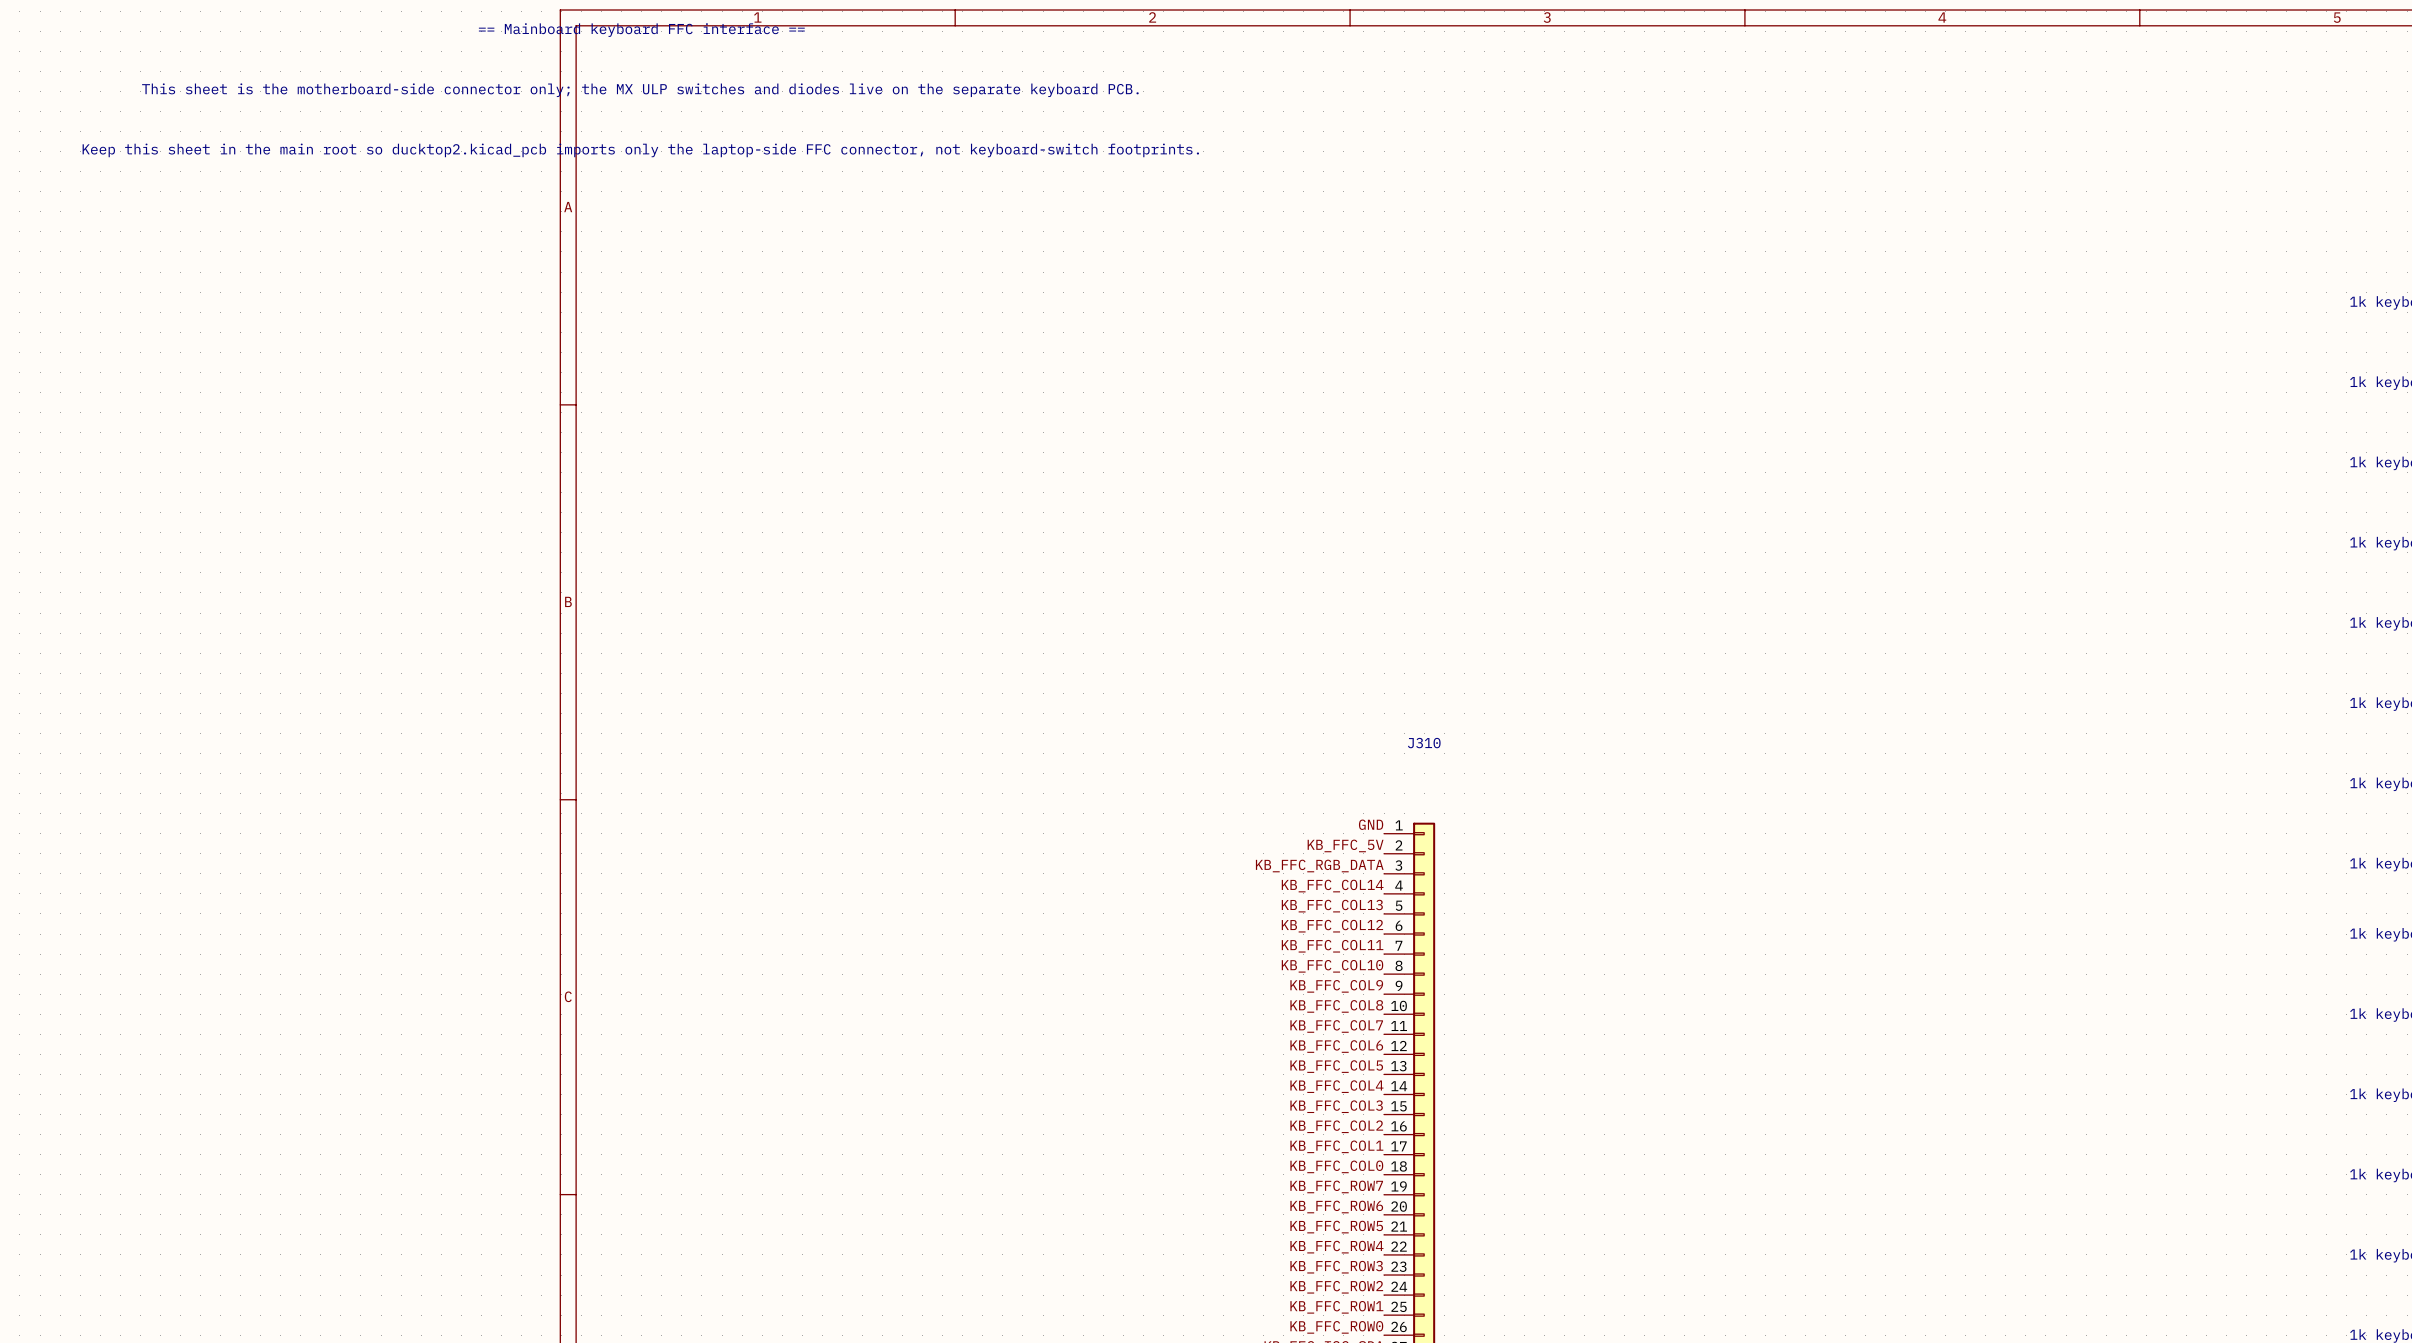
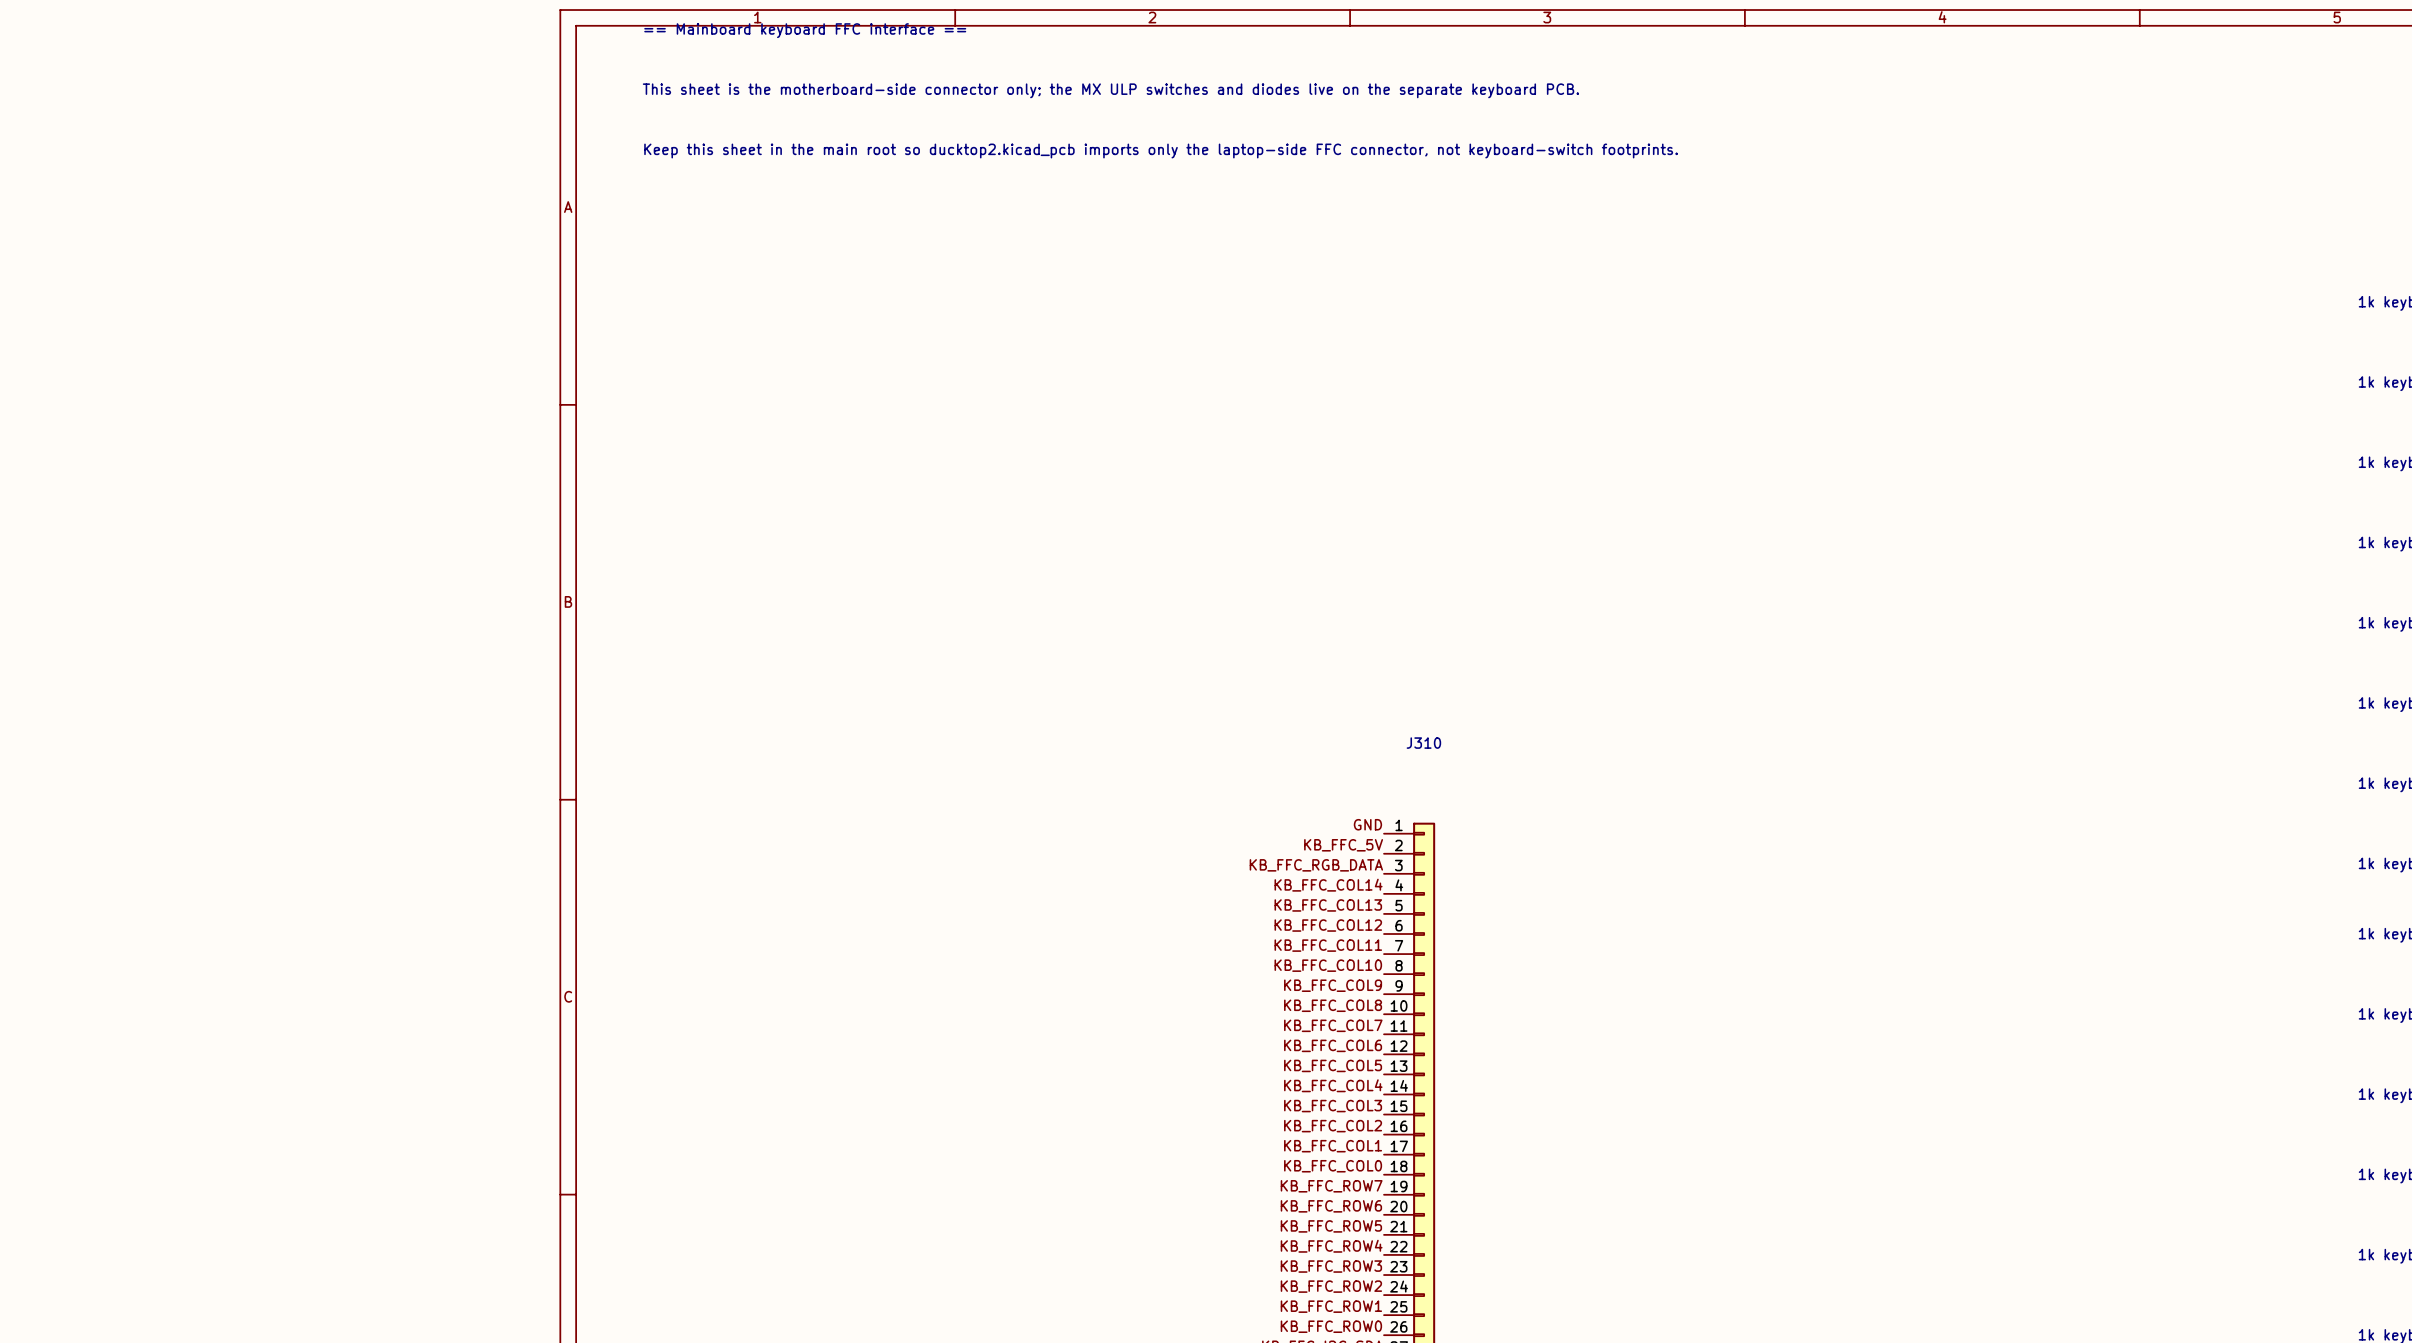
text position: == Mainboard keyboard FFC interface == (641, 30) -> == Mainboard keyboard FFC interface == (805, 30)
text position: This sheet is the motherboard-side connector only; the MX ULP switches and diodes live on the separate keyboard PCB. (640, 90) -> This sheet is the motherboard-side connector only; the MX ULP switches and diodes live on the separate keyboard PCB. (1110, 90)
text position: Keep this sheet in the main root so ducktop2.kicad_pcb imports only the laptop-side FFC connector, not keyboard-switch footprints. (640, 150) -> Keep this sheet in the main root so ducktop2.kicad_pcb imports only the laptop-side FFC connector, not keyboard-switch footprints. (1161, 151)

